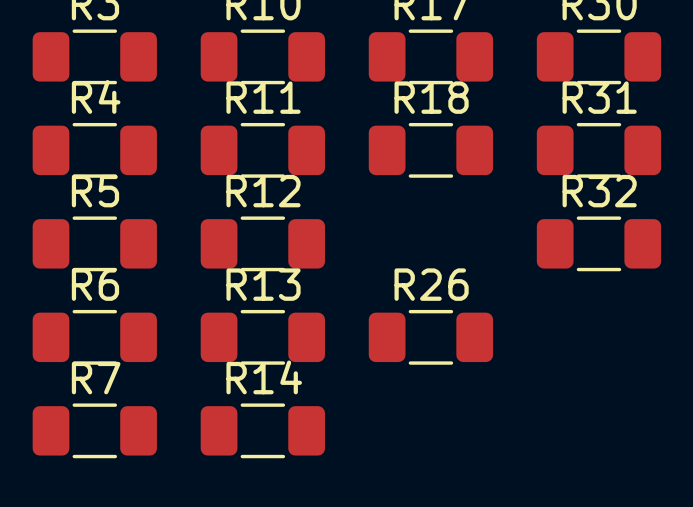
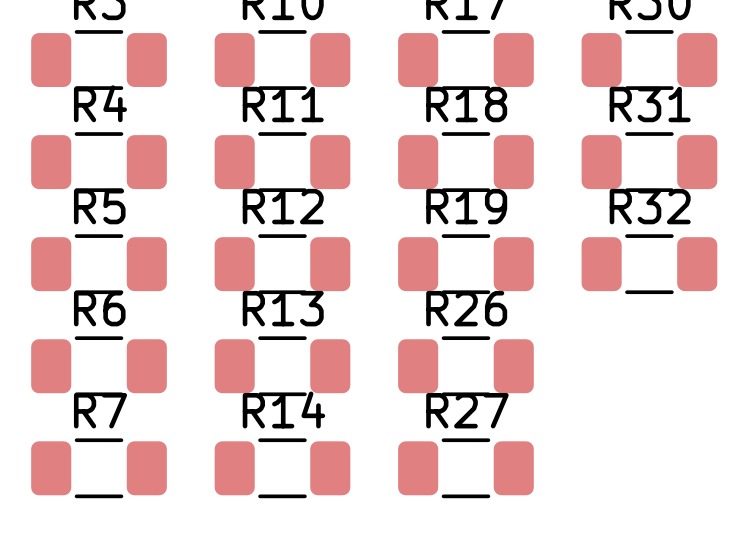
R19: none -> (465, 264)
R27: none -> (465, 468)

